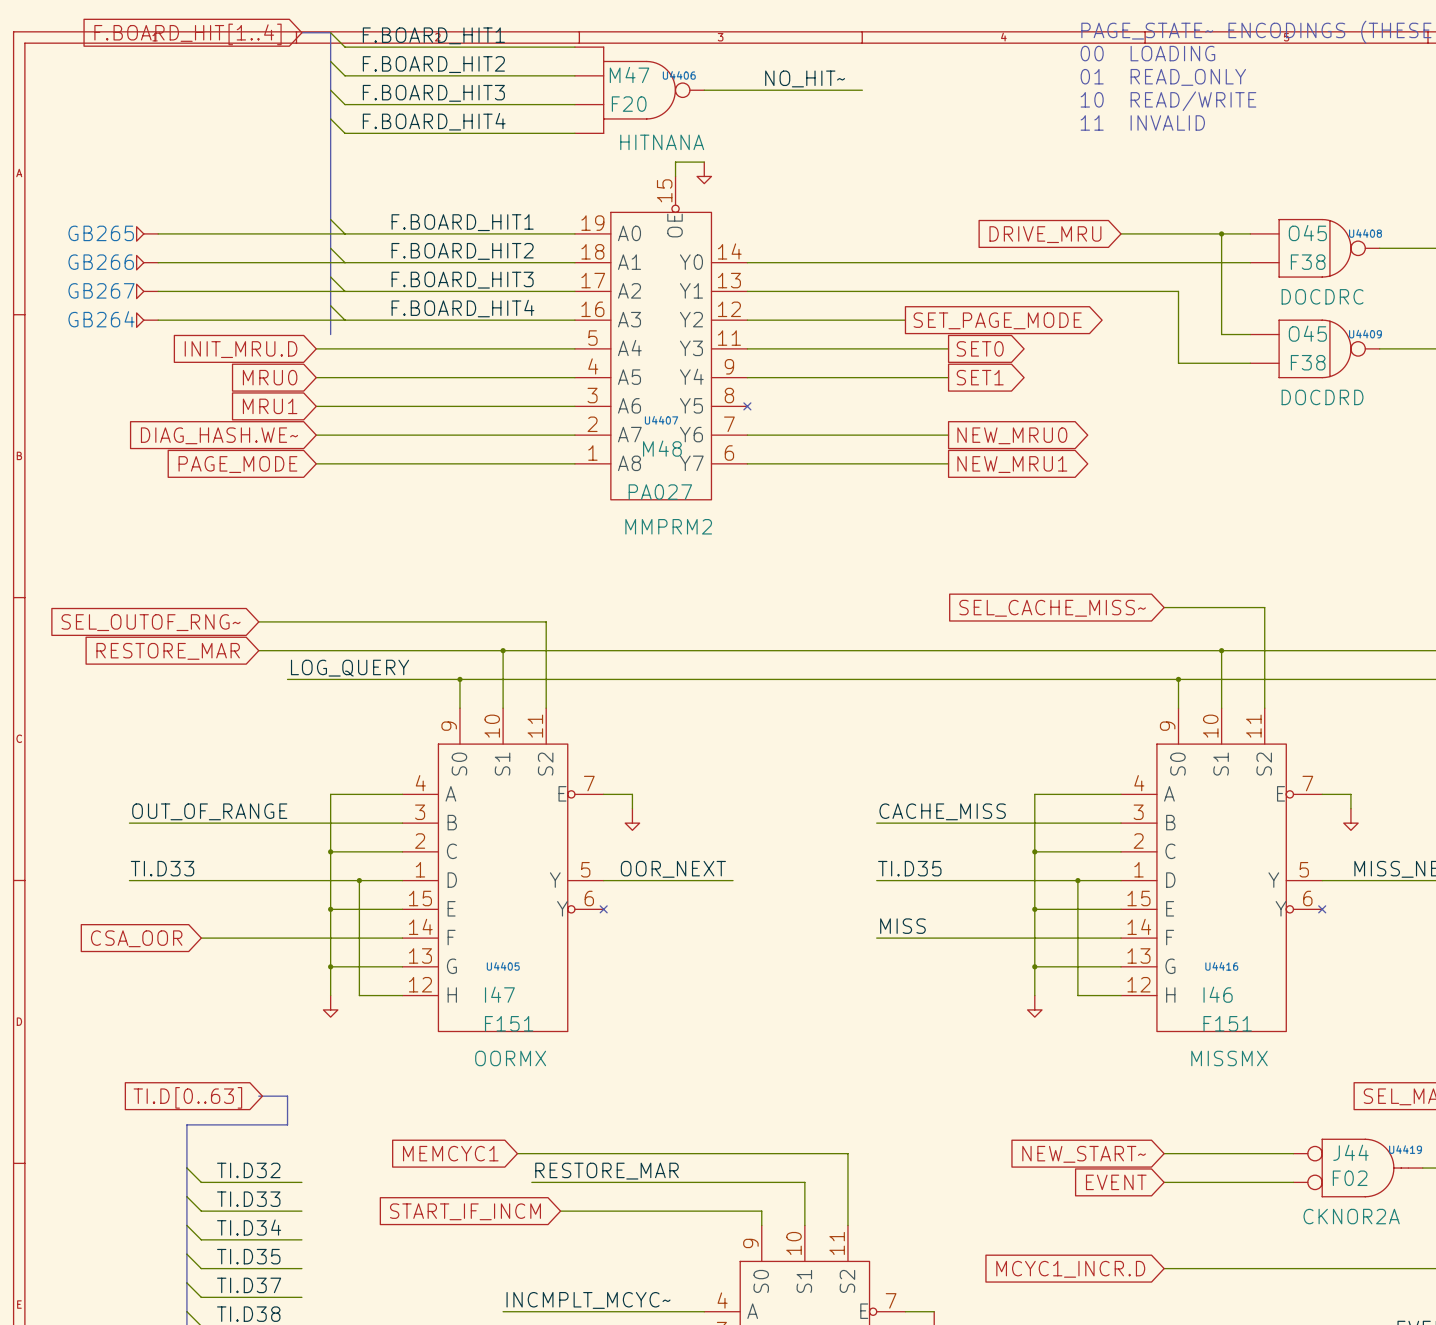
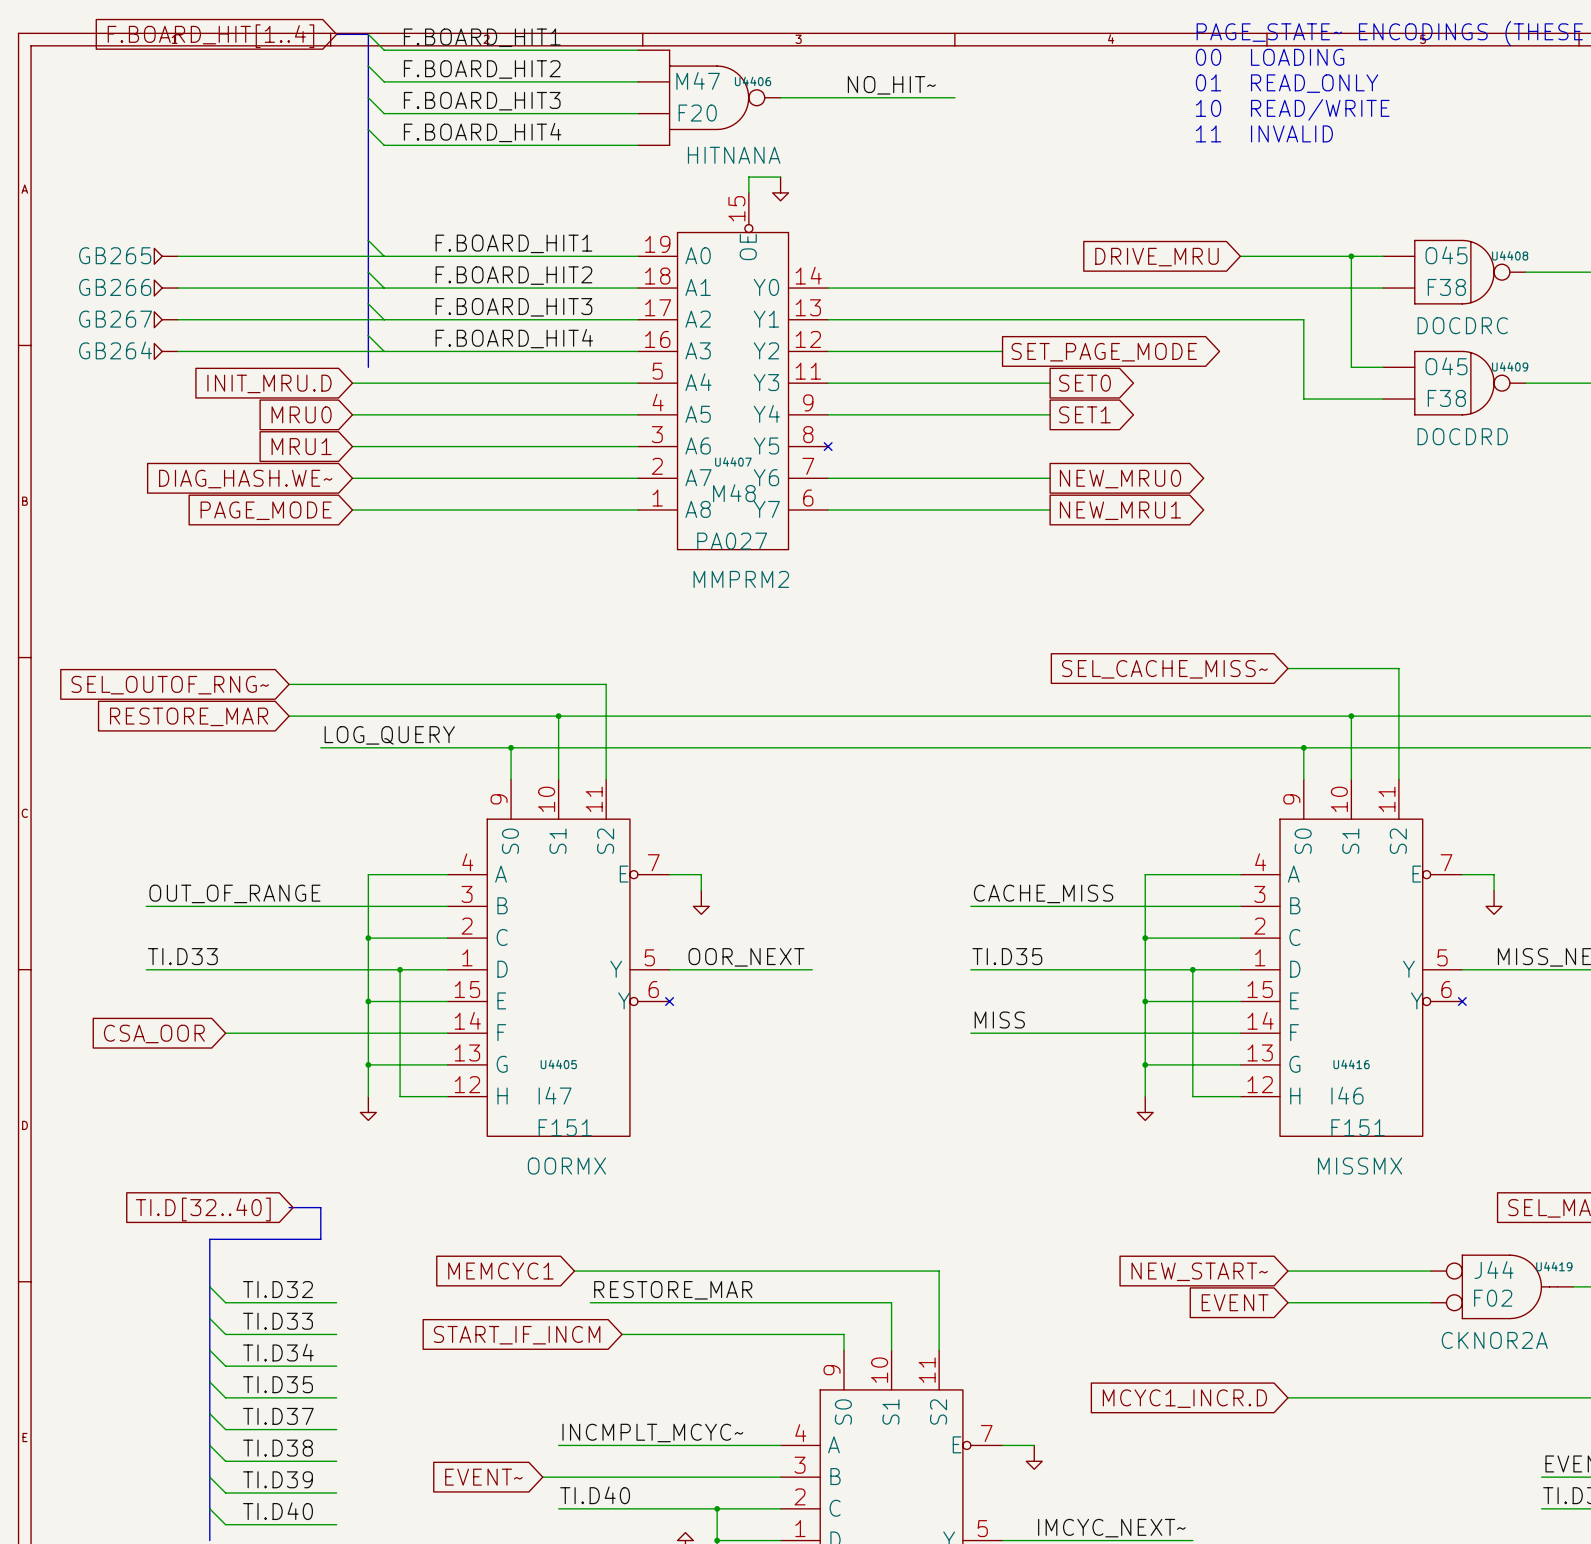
global label: TI.D[0..63] (187, 1097) -> TI.D[32..40] (203, 1209)

